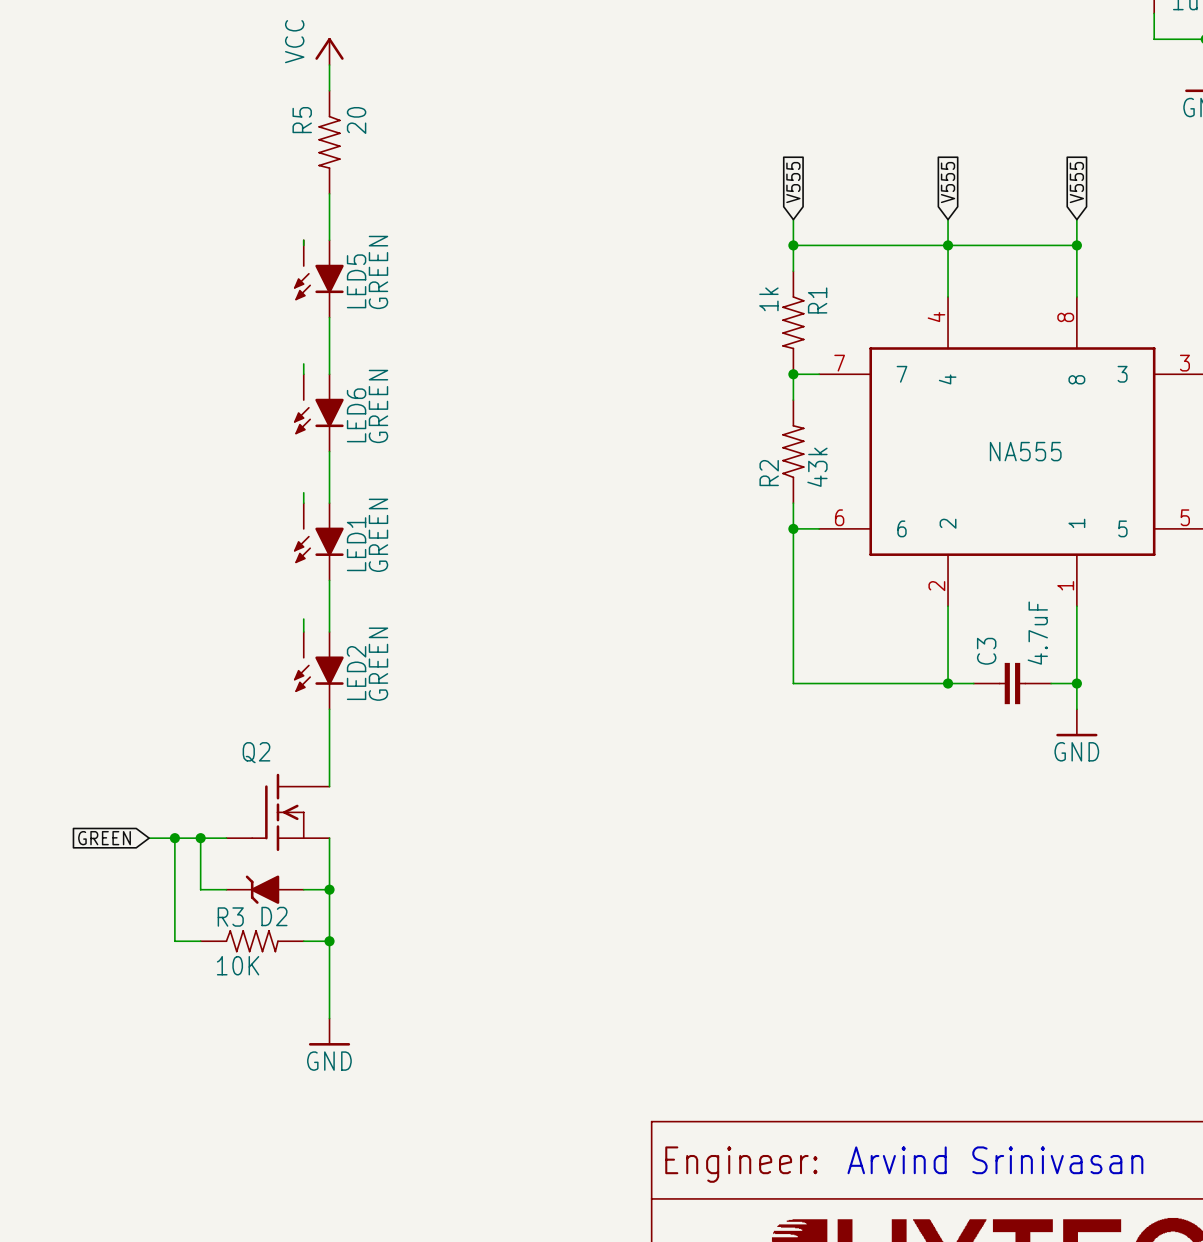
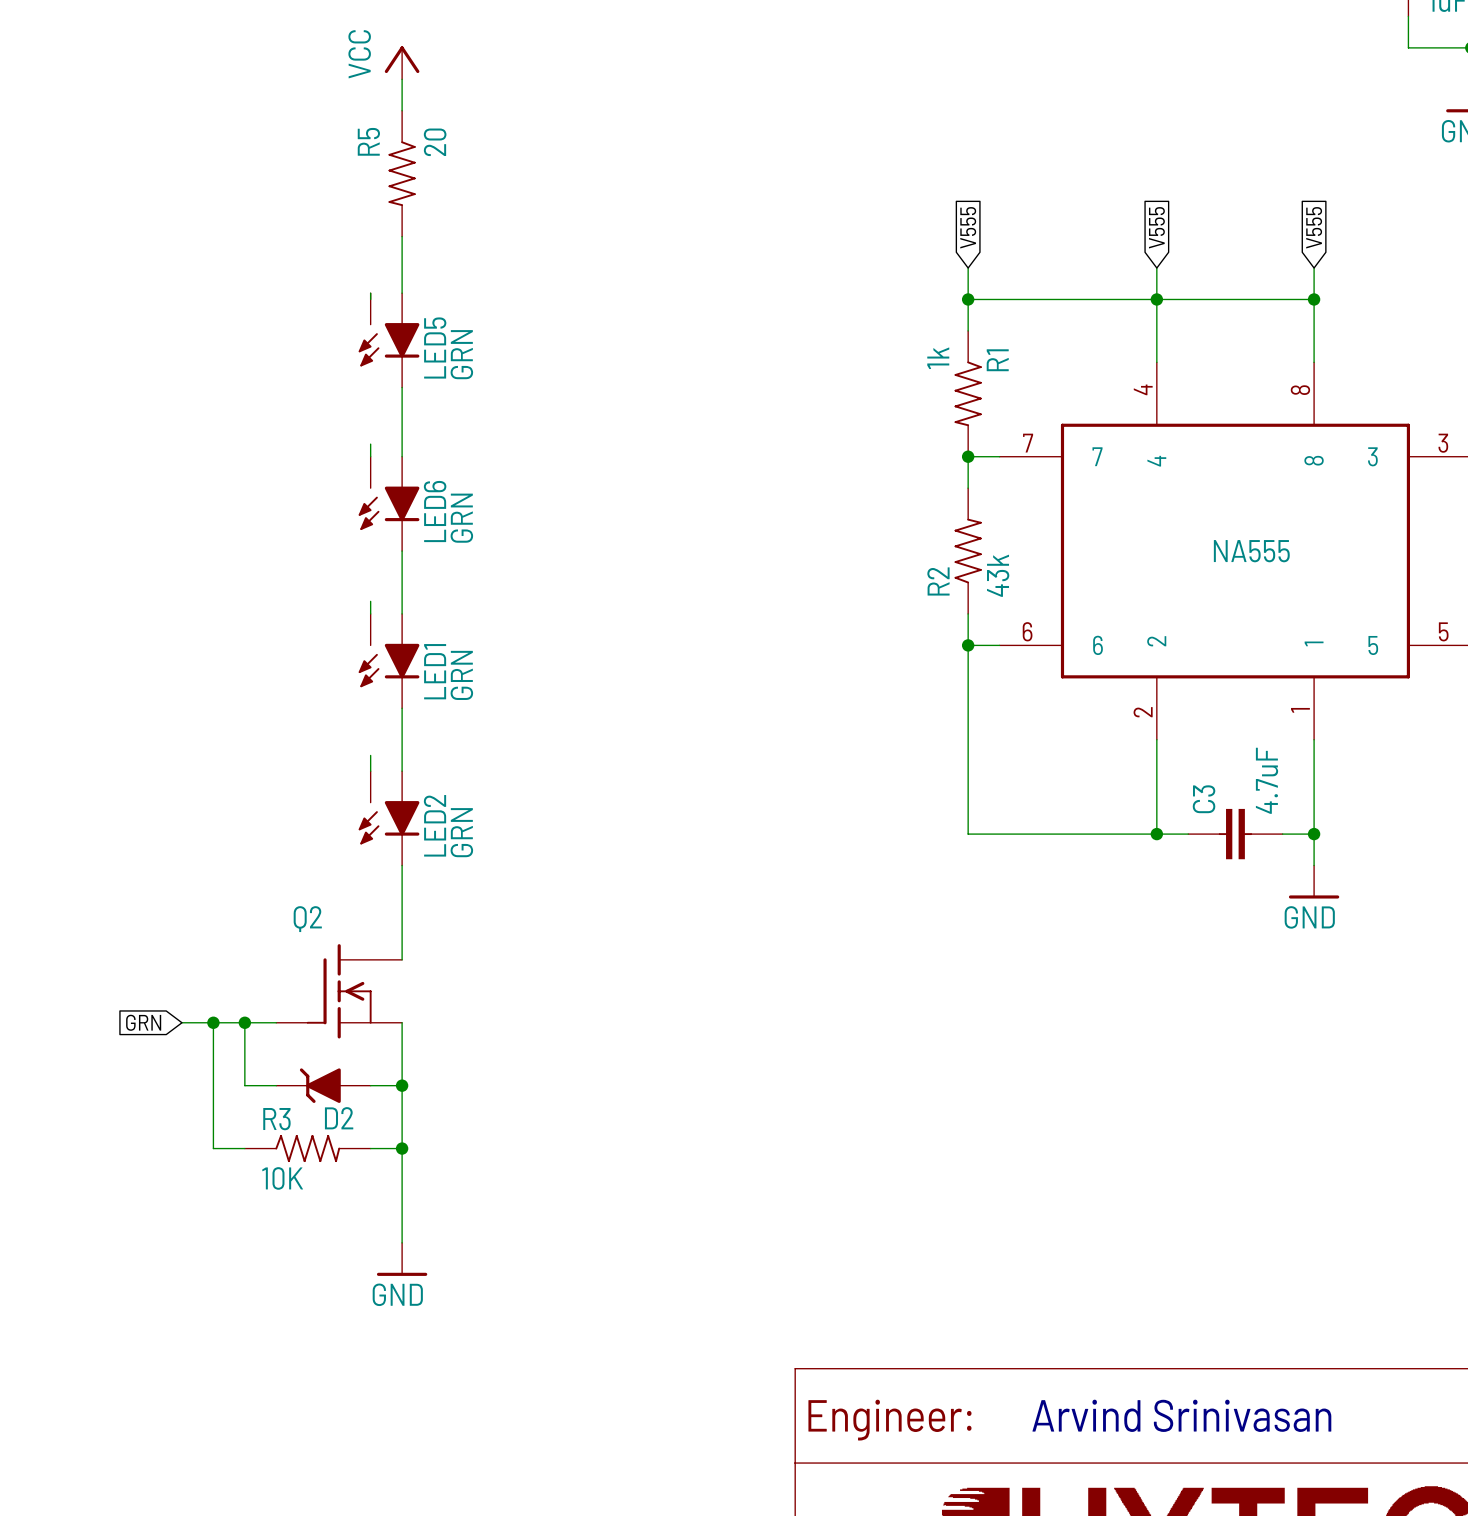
LED5 value: GREEN (378, 272) -> GRN (461, 354)
LED6 value: GREEN (378, 406) -> GRN (461, 518)
LED1 value: GREEN (378, 535) -> GRN (461, 675)
LED2 value: GREEN (378, 664) -> GRN (461, 832)
global label: GREEN (104, 838) -> GRN (143, 1022)

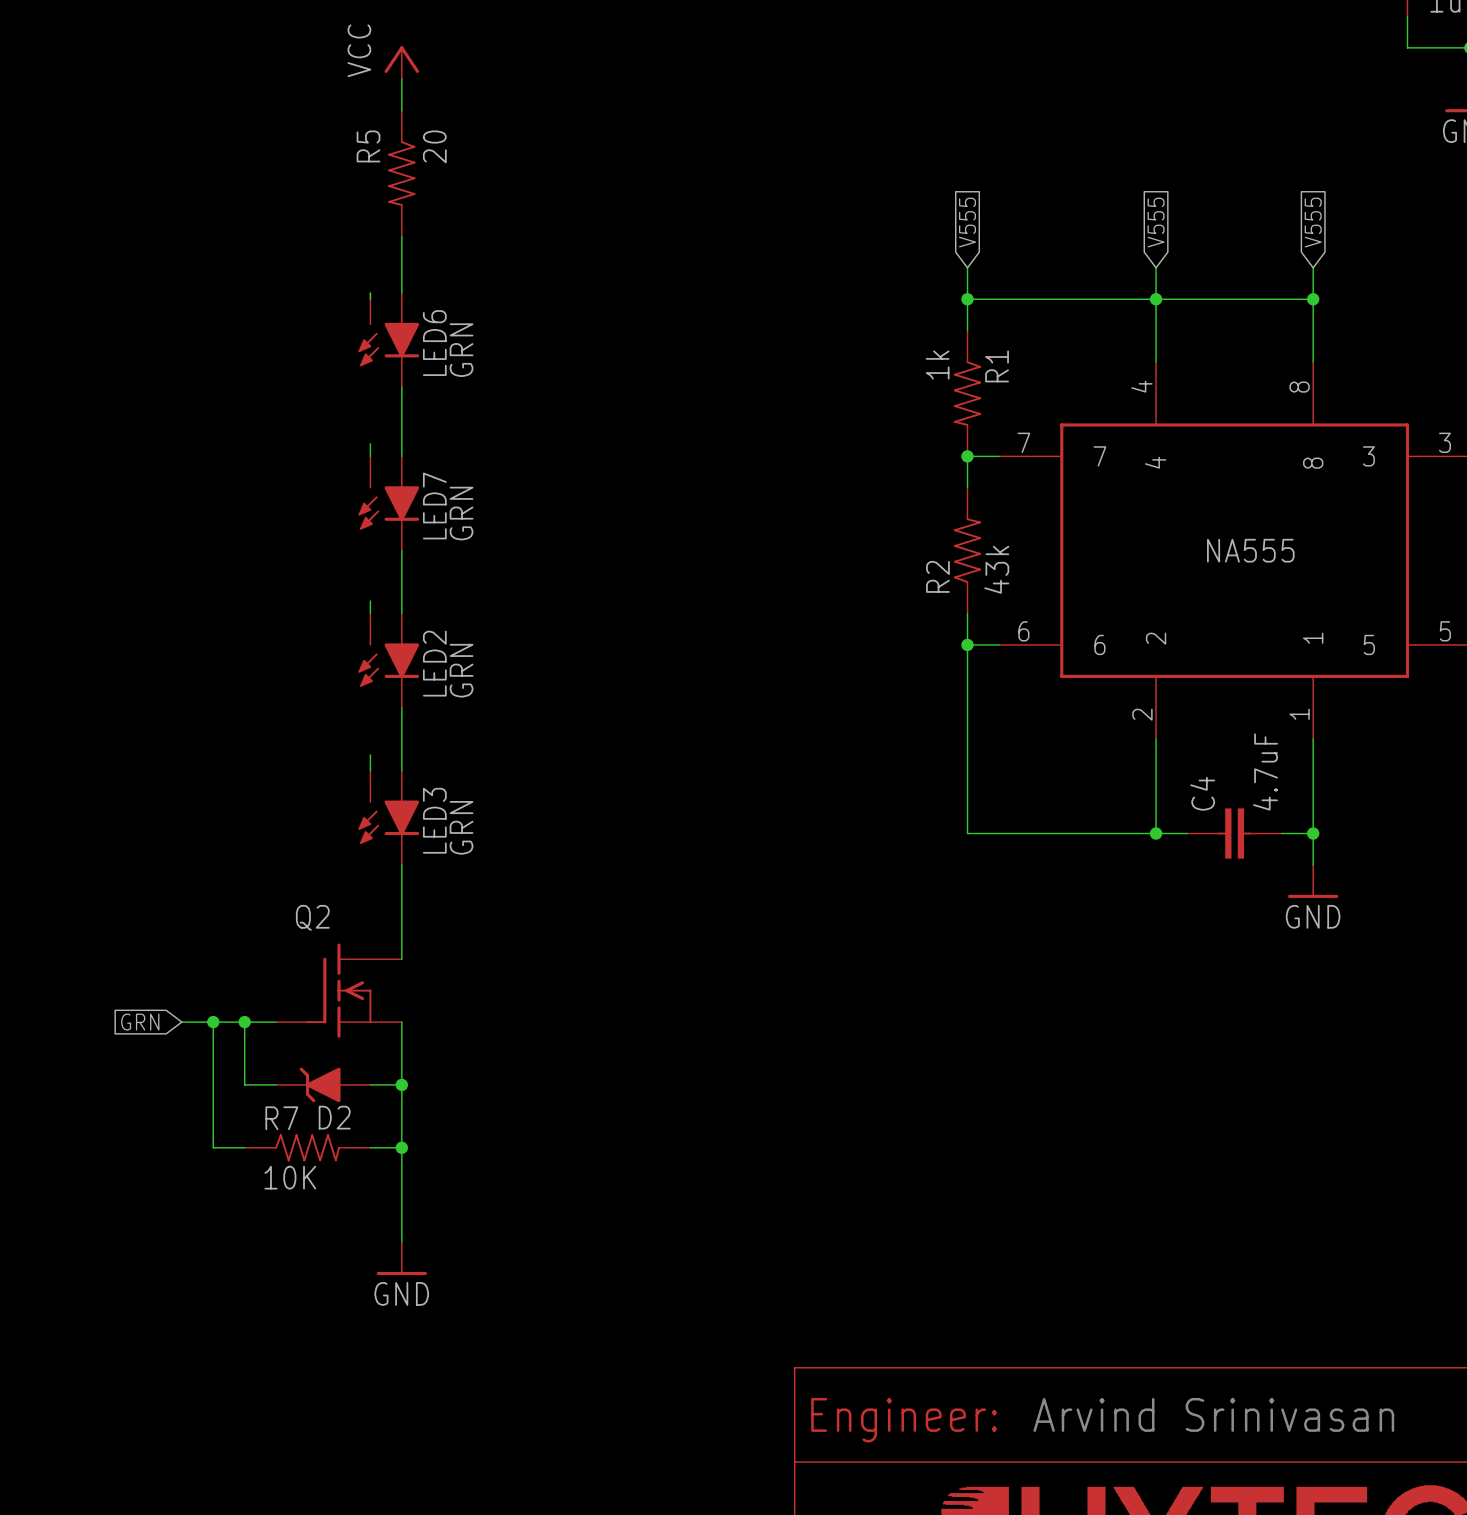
LED5 name: LED5 (435, 347) -> LED6 (434, 343)
LED6 name: LED6 (435, 511) -> LED7 (434, 506)
LED1 name: LED1 (435, 671) -> LED2 (434, 663)
C3 name: C3 (1204, 799) -> C4 (1202, 793)
LED2 name: LED2 (434, 825) -> LED3 (434, 820)
R3 name: R3 (276, 1119) -> R7 (281, 1118)

